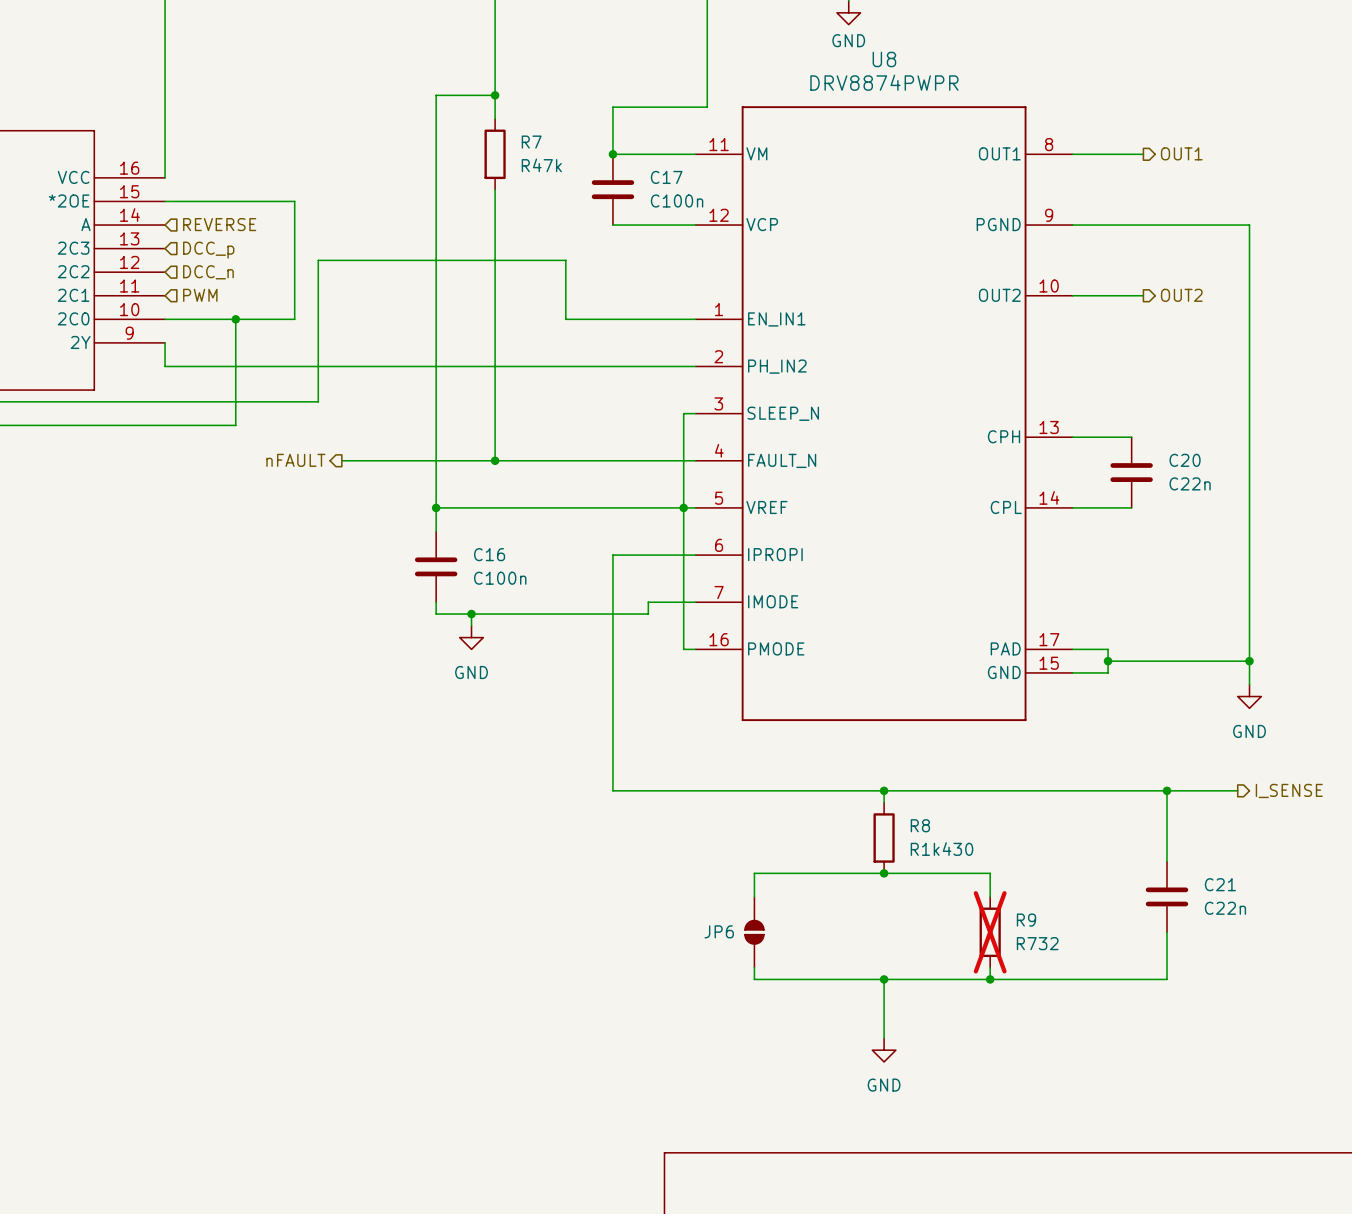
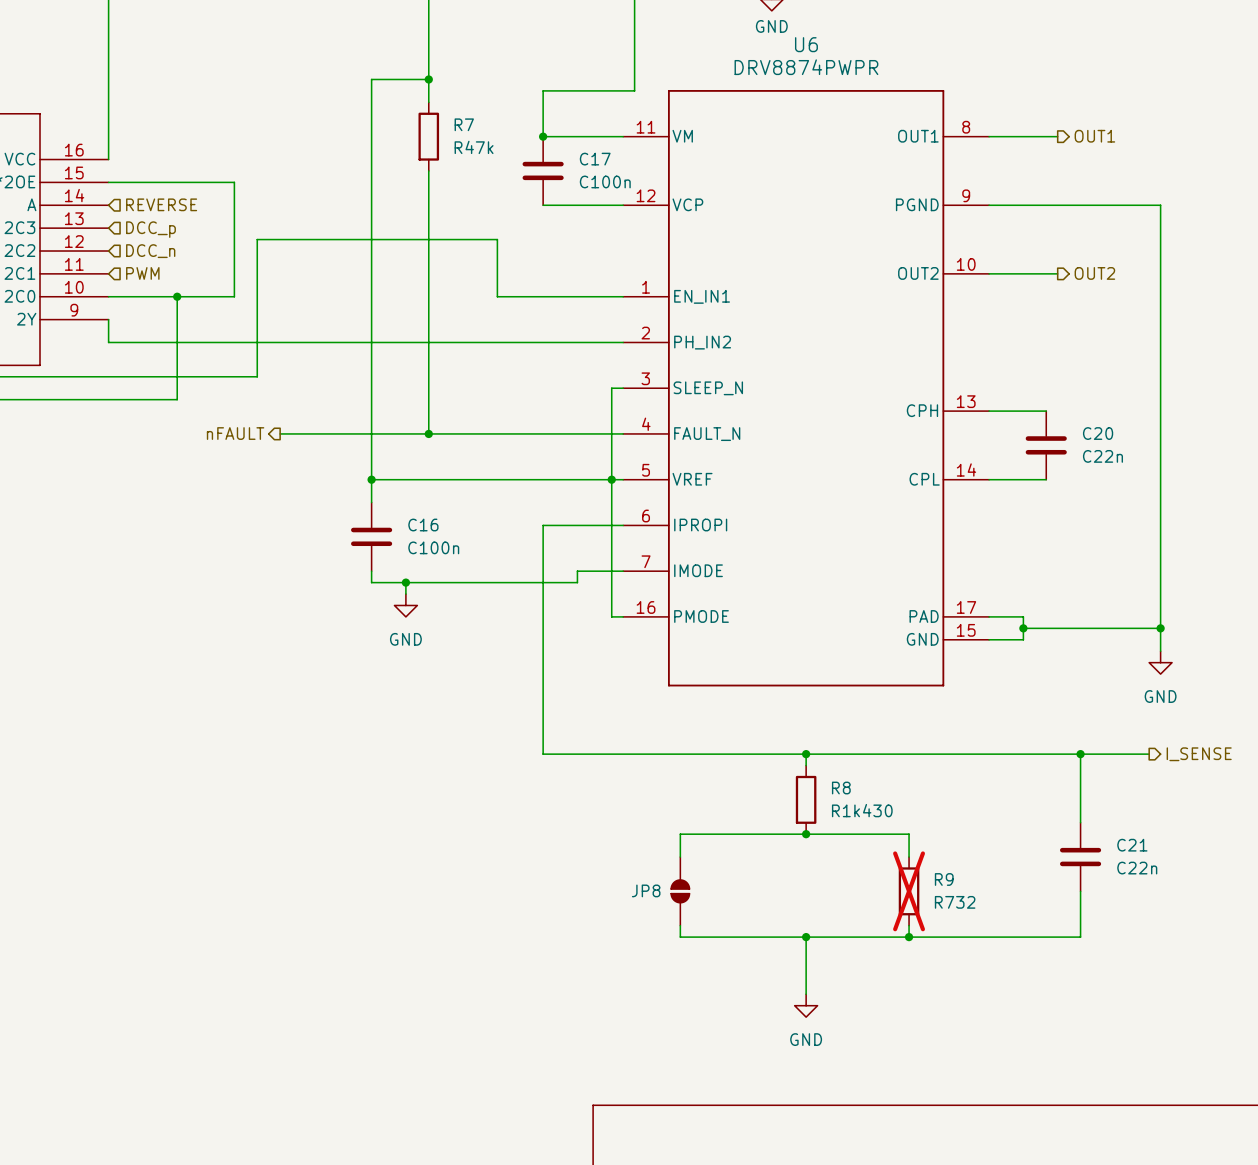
U8 name: U8 (884, 59) -> U6 (806, 44)
JP6 name: JP6 (719, 931) -> JP8 (646, 890)

